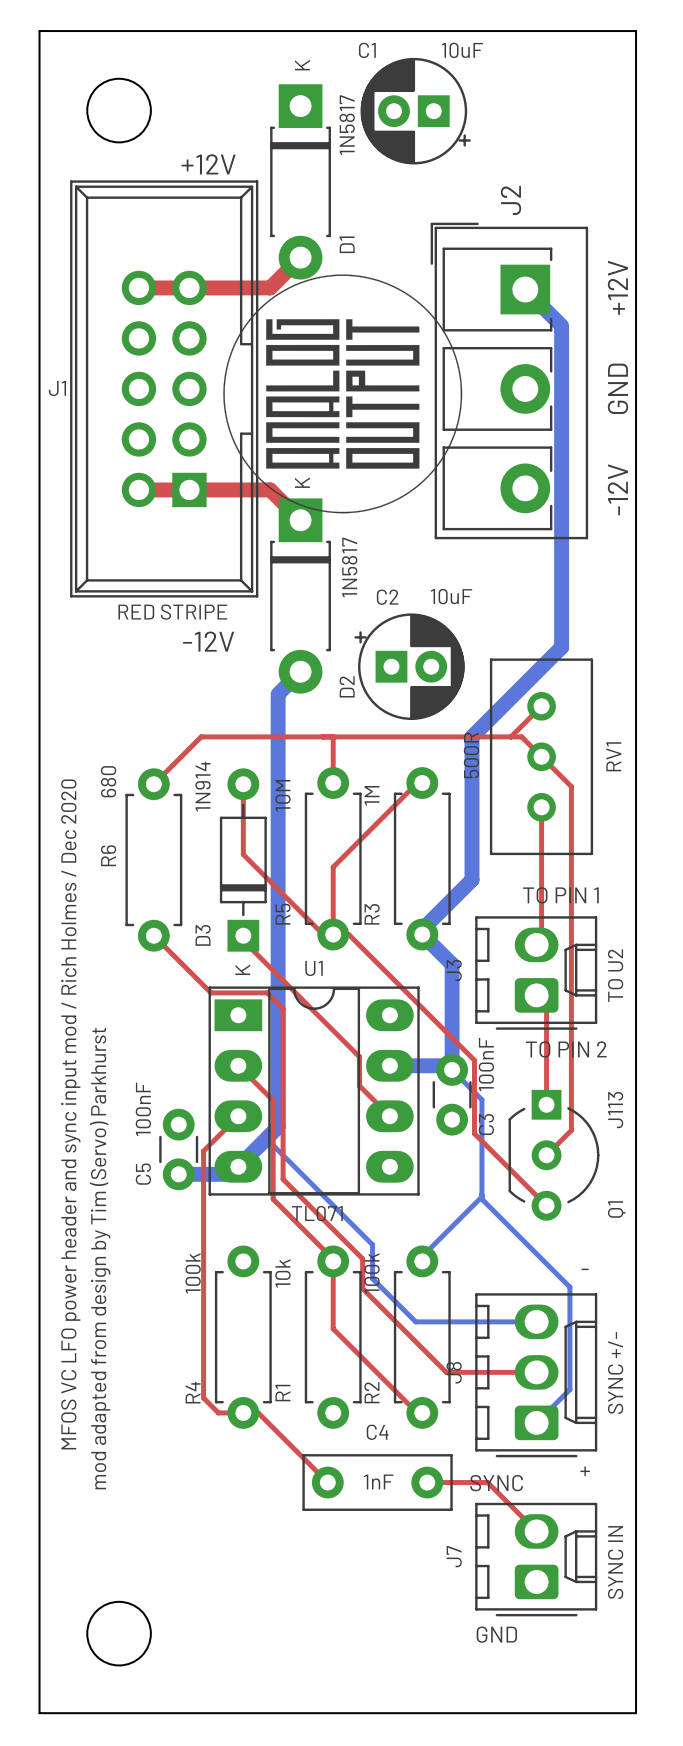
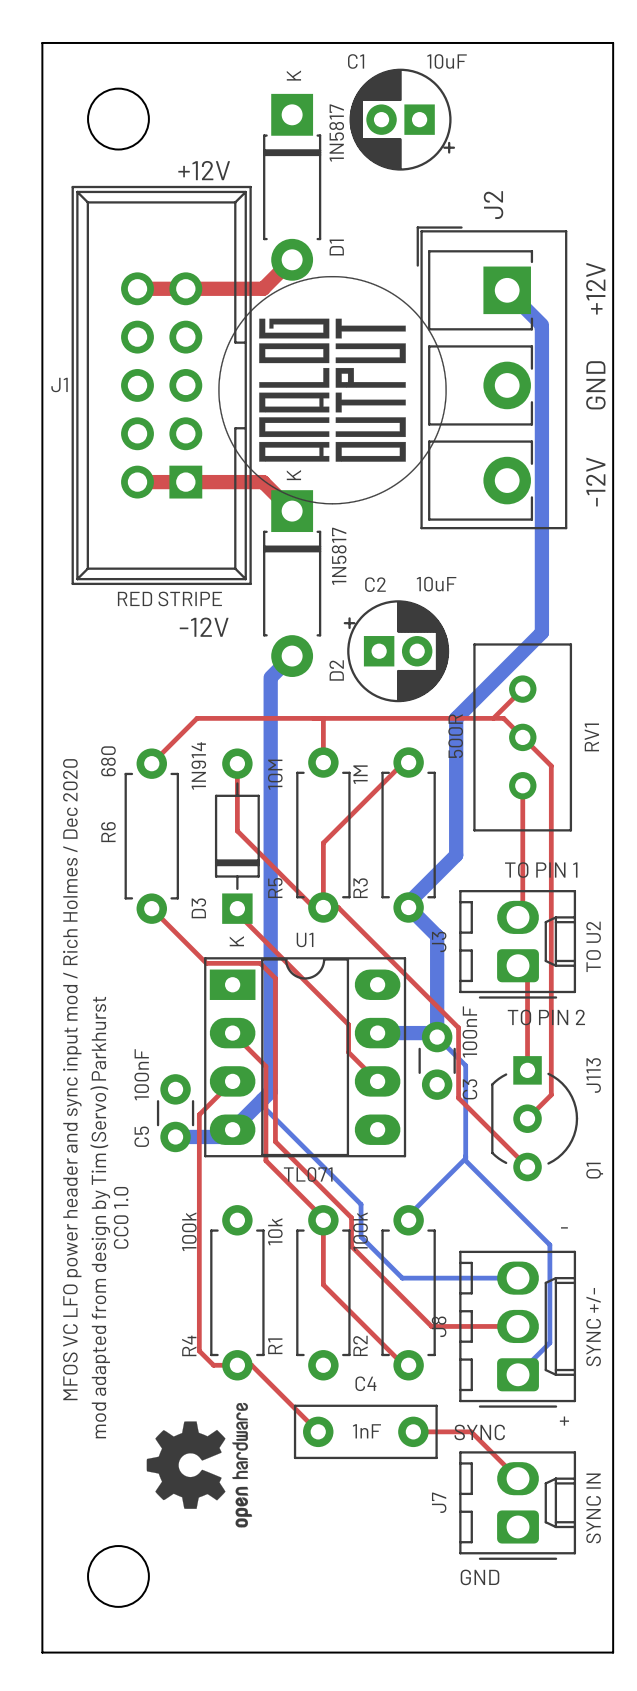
text: none -> CC0 1.0 (121, 1217)
drawing: none -> [146, 1402, 253, 1528]

